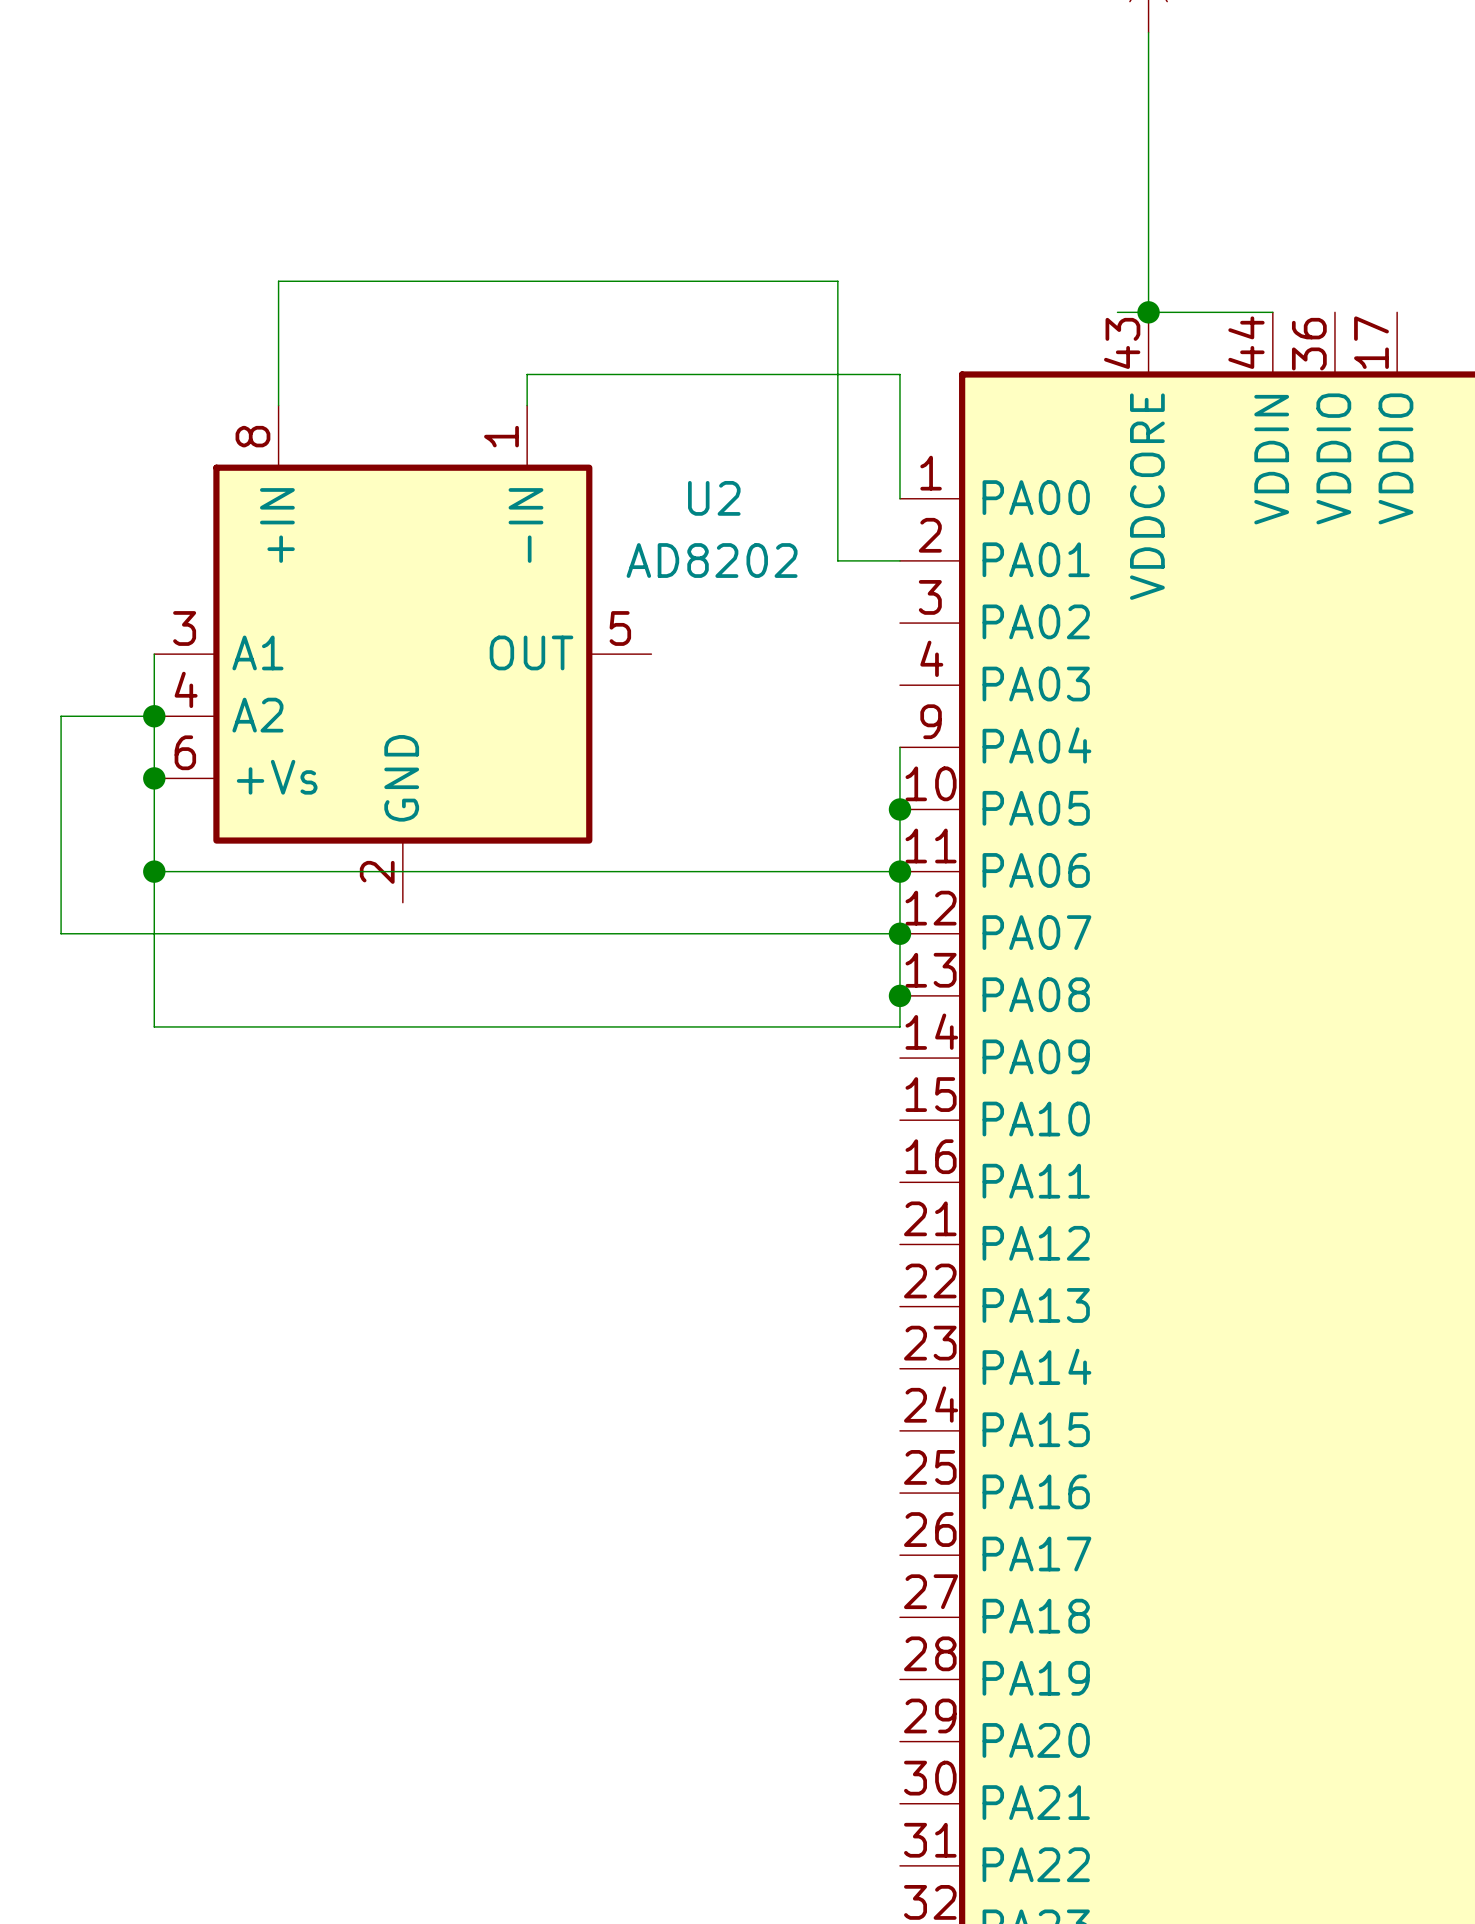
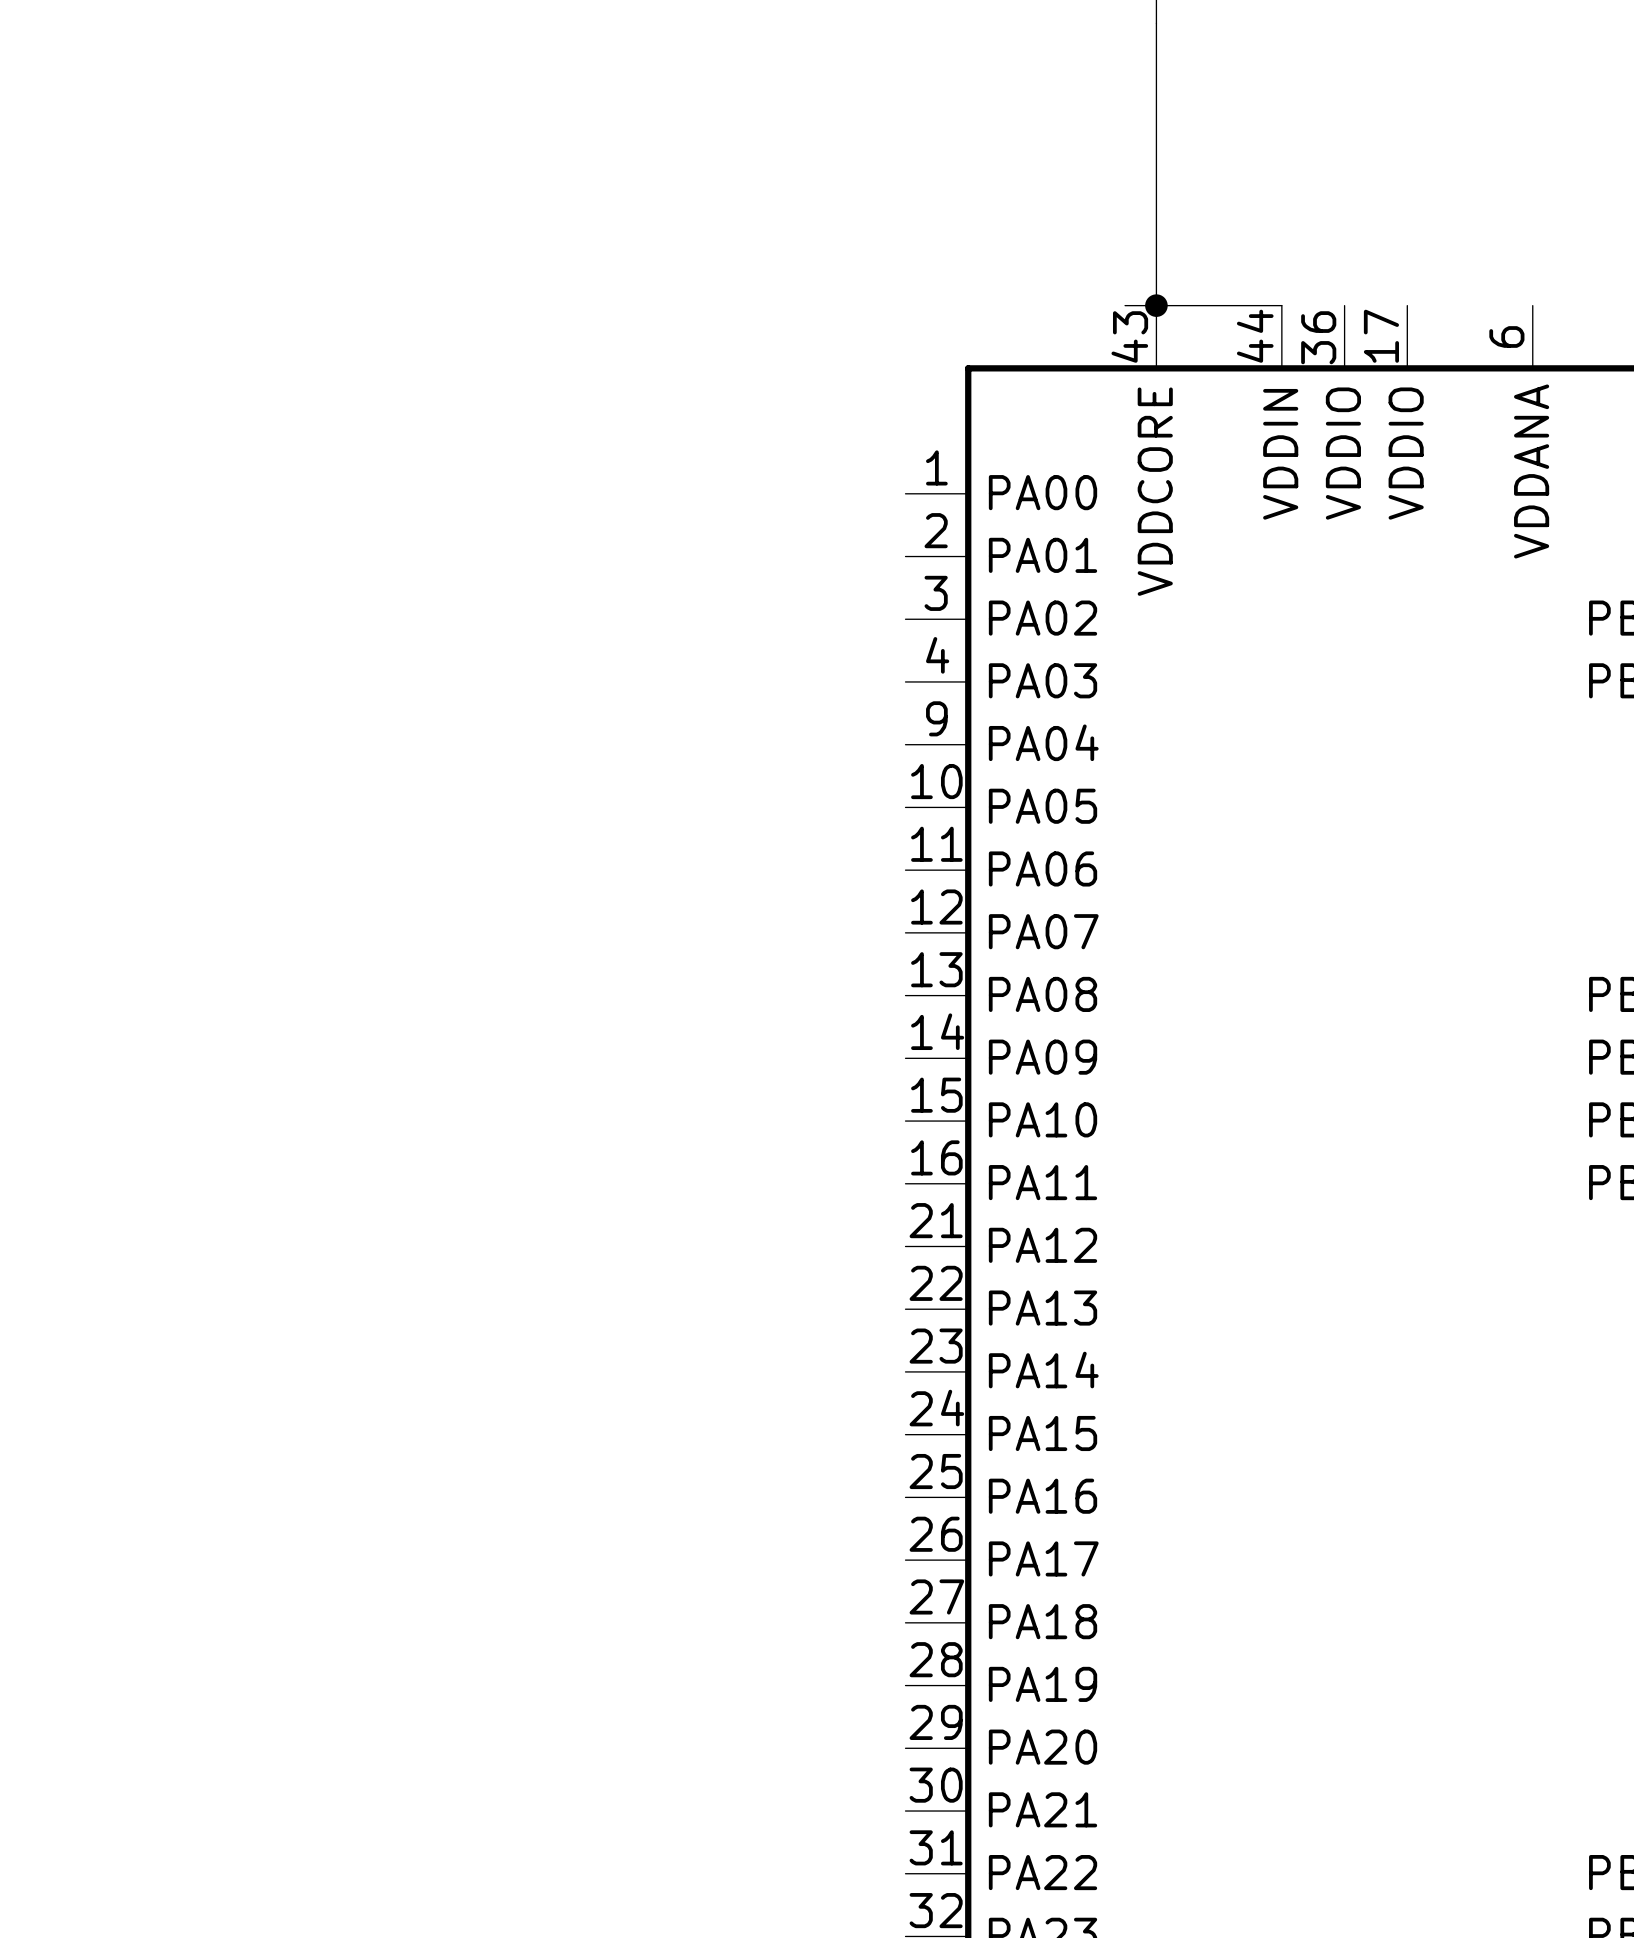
wire: (278, 405) (278, 281) (837, 281) (837, 560) (899, 560) -> none
wire: (527, 405) (527, 374) (899, 374) (899, 498) -> none
wire: (154, 654) (154, 1026) (899, 1026) (899, 747) -> none
U2: AD8202 (402, 654) -> none
wire: (154, 716) (61, 716) (61, 933) (899, 933) -> none
junction: (154, 716) -> none
junction: (154, 778) -> none
junction: (899, 809) -> none
wire: (154, 871) (899, 871) -> none
junction: (154, 871) -> none
junction: (899, 871) -> none
junction: (899, 933) -> none
junction: (899, 995) -> none

